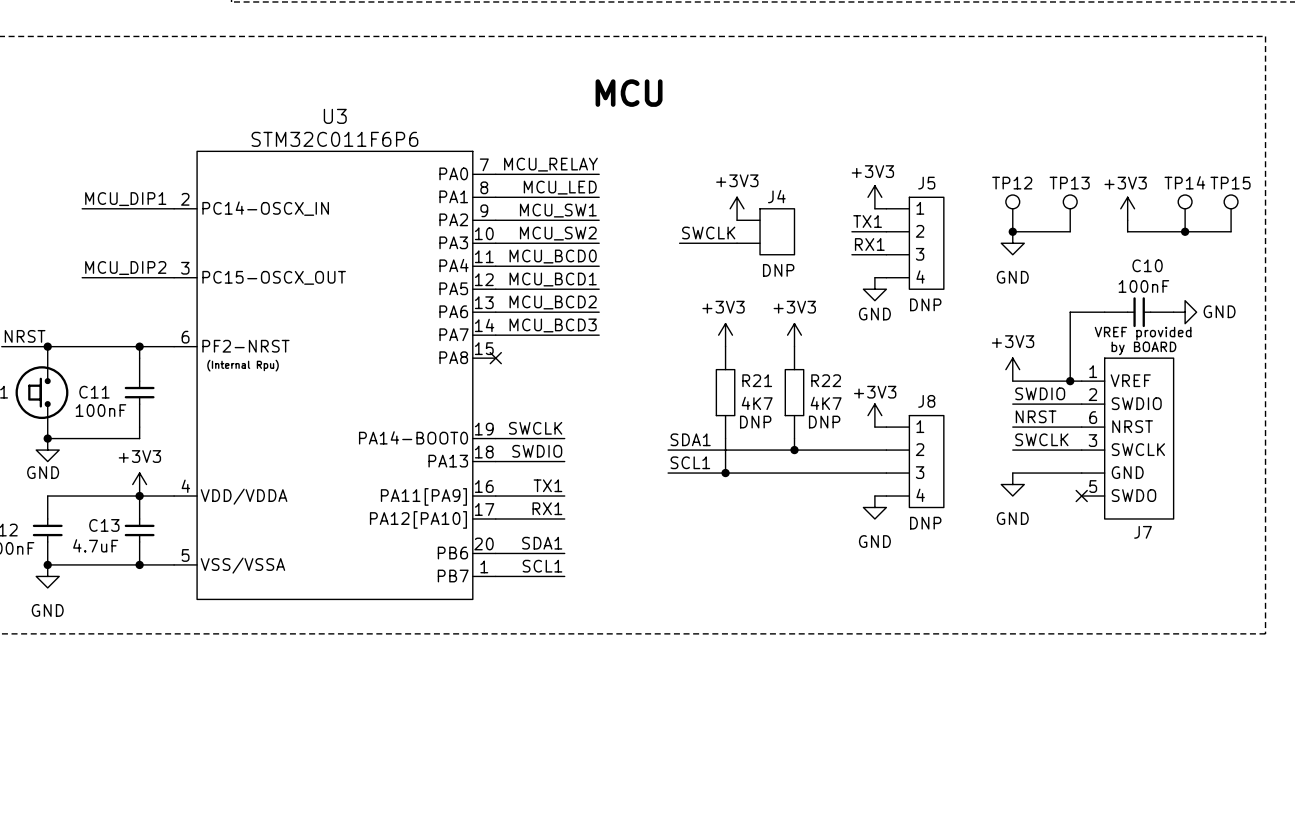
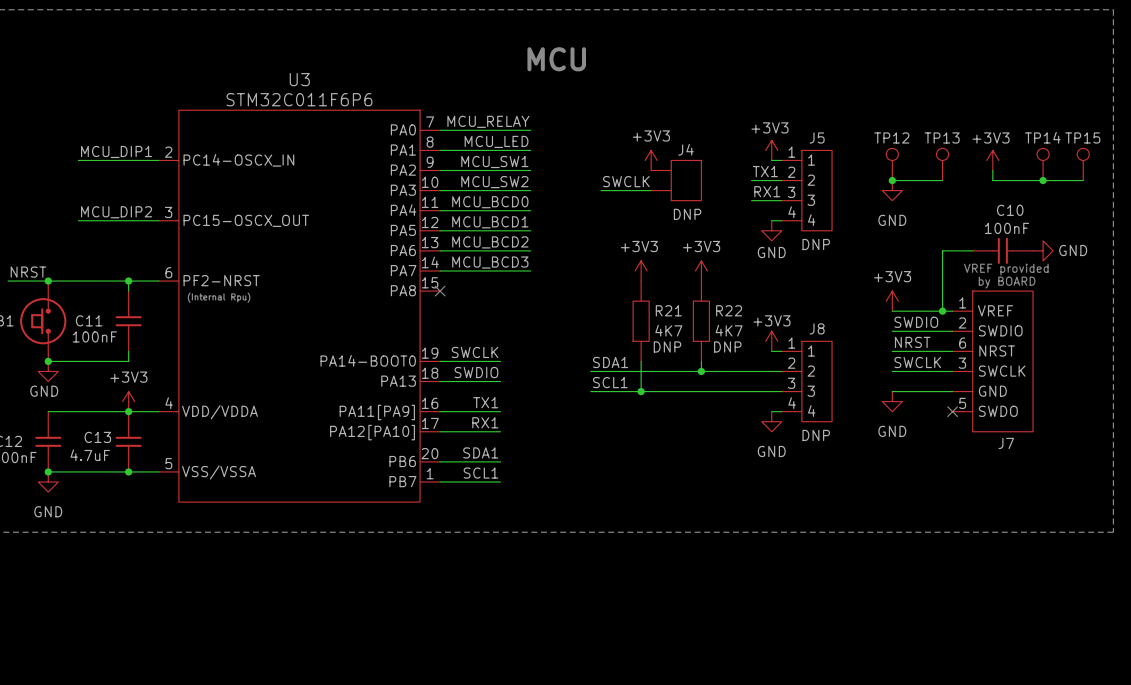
J5 pin number: none -> 1 (791, 152)
J5 pin number: none -> 2 (791, 172)
J5 pin number: none -> 3 (791, 192)
J5 pin number: none -> 4 (792, 212)
J8 pin number: none -> 1 (791, 343)
J8 pin number: none -> 2 (791, 363)
J8 pin number: none -> 3 (791, 383)
J8 pin number: none -> 4 (792, 403)

